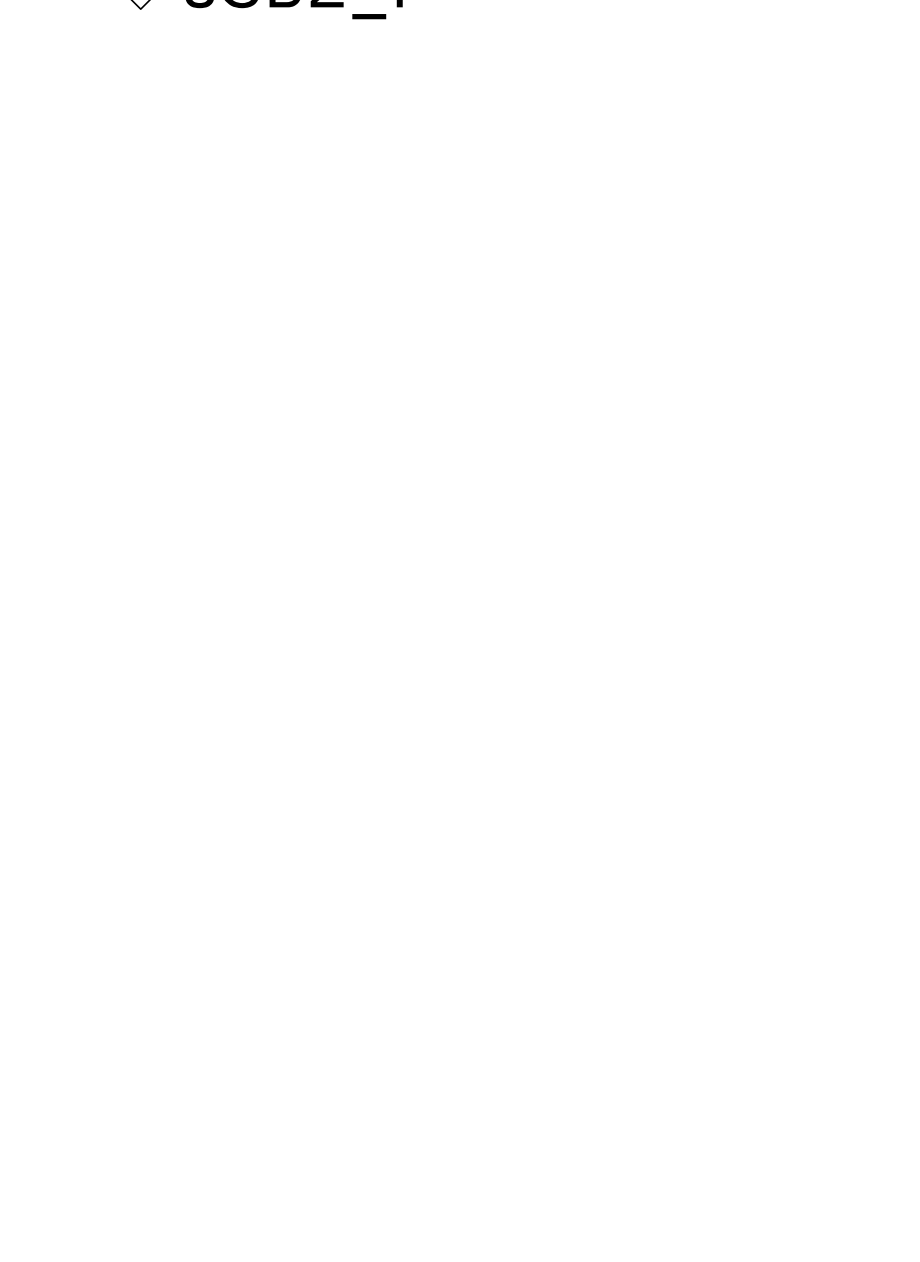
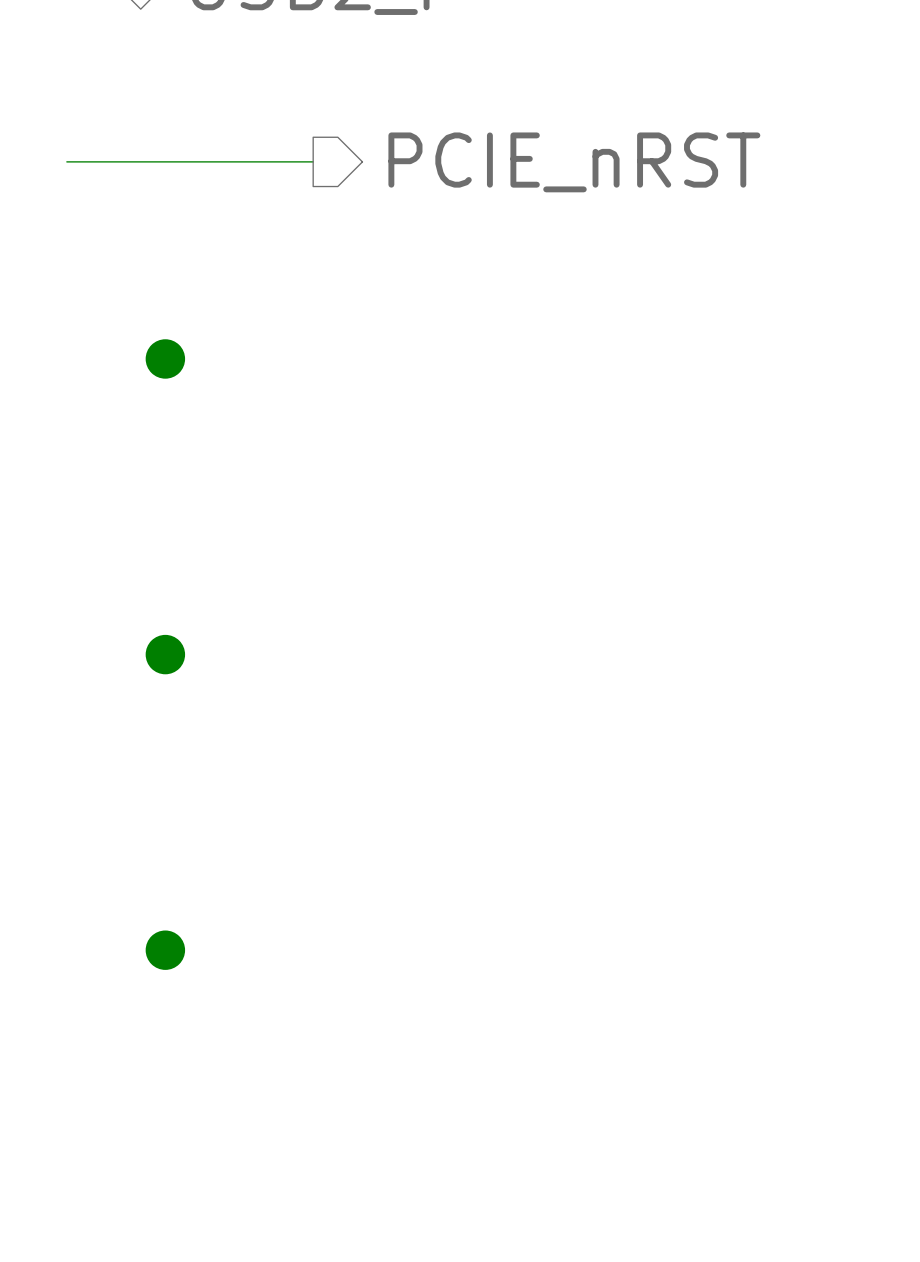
wire: none -> (66, 161) (313, 161)
hierarchical label: none -> PCIE_nRST (574, 162)
junction: none -> (165, 358)
junction: none -> (165, 654)
junction: none -> (165, 950)

